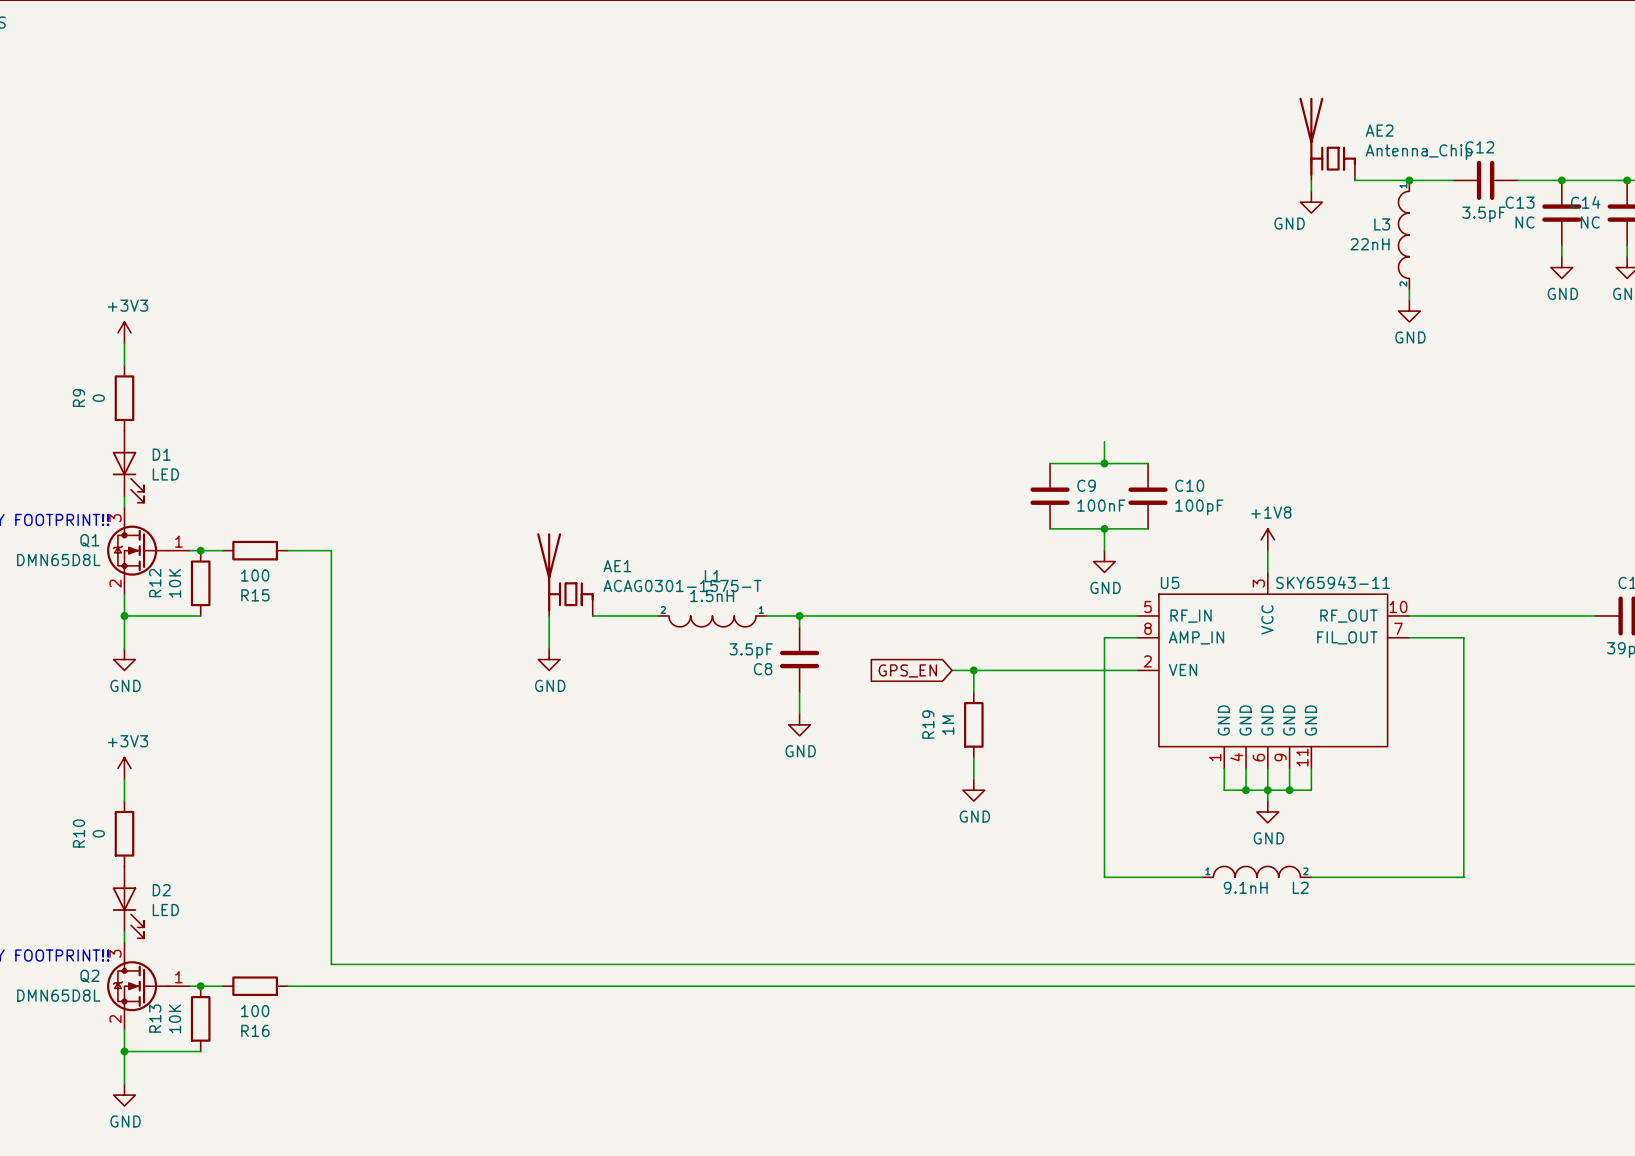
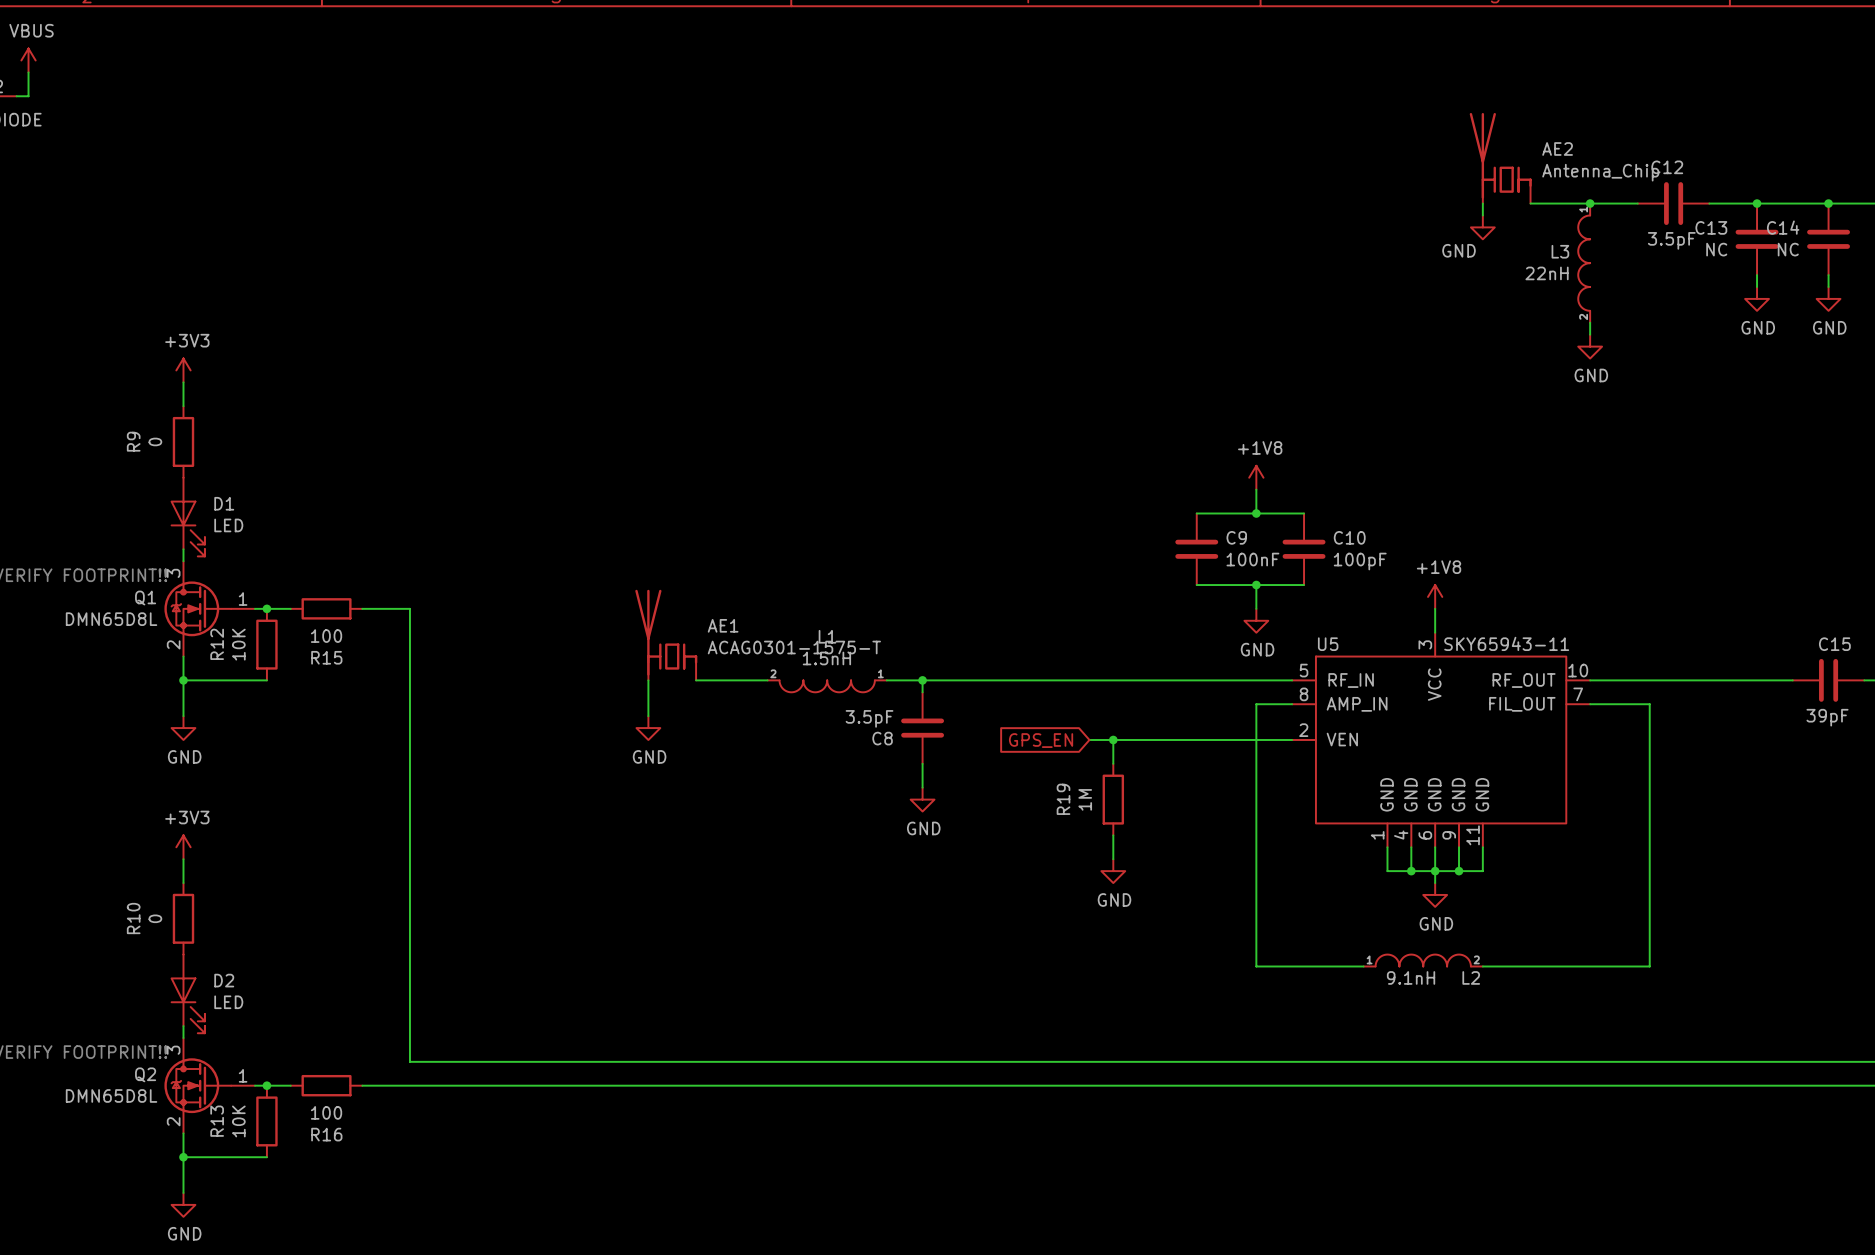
power symbol: none -> +1V8 (1256, 477)

